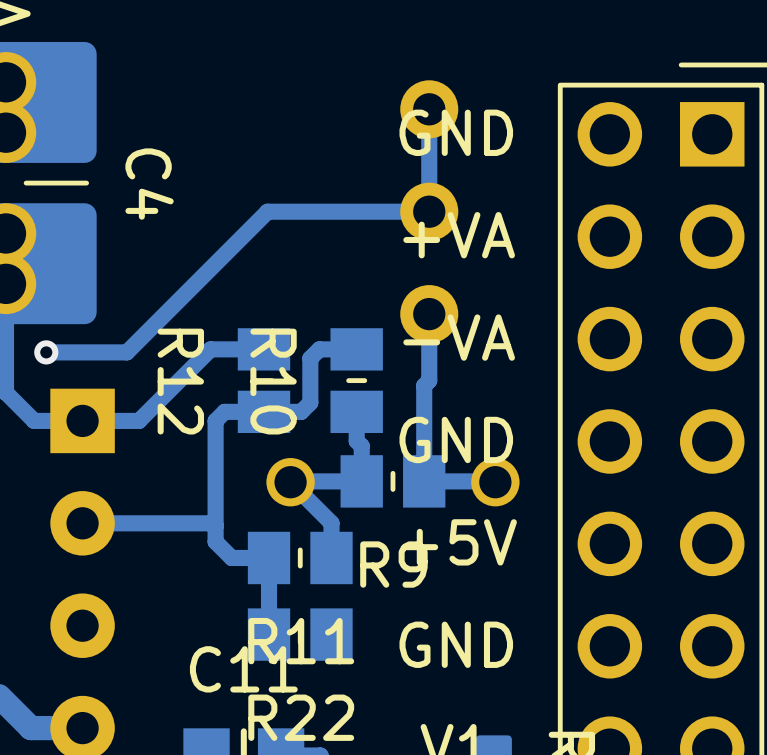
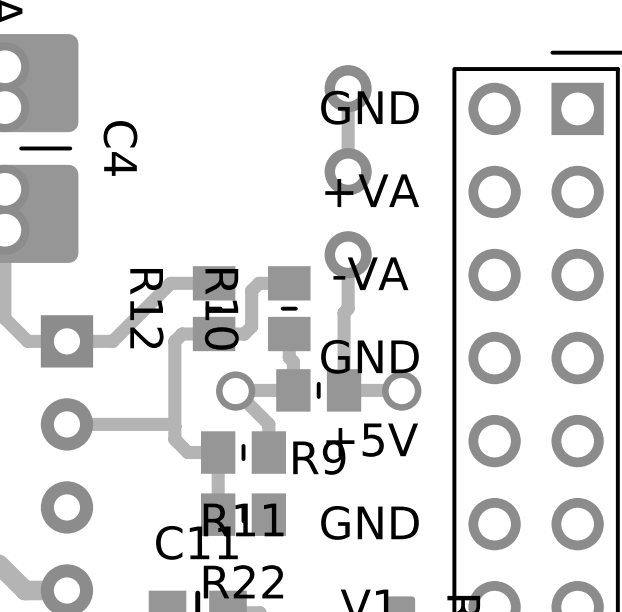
track: (429, 211) (267, 211) (126, 352) (46, 352) -> none
via: (46, 352) -> none

